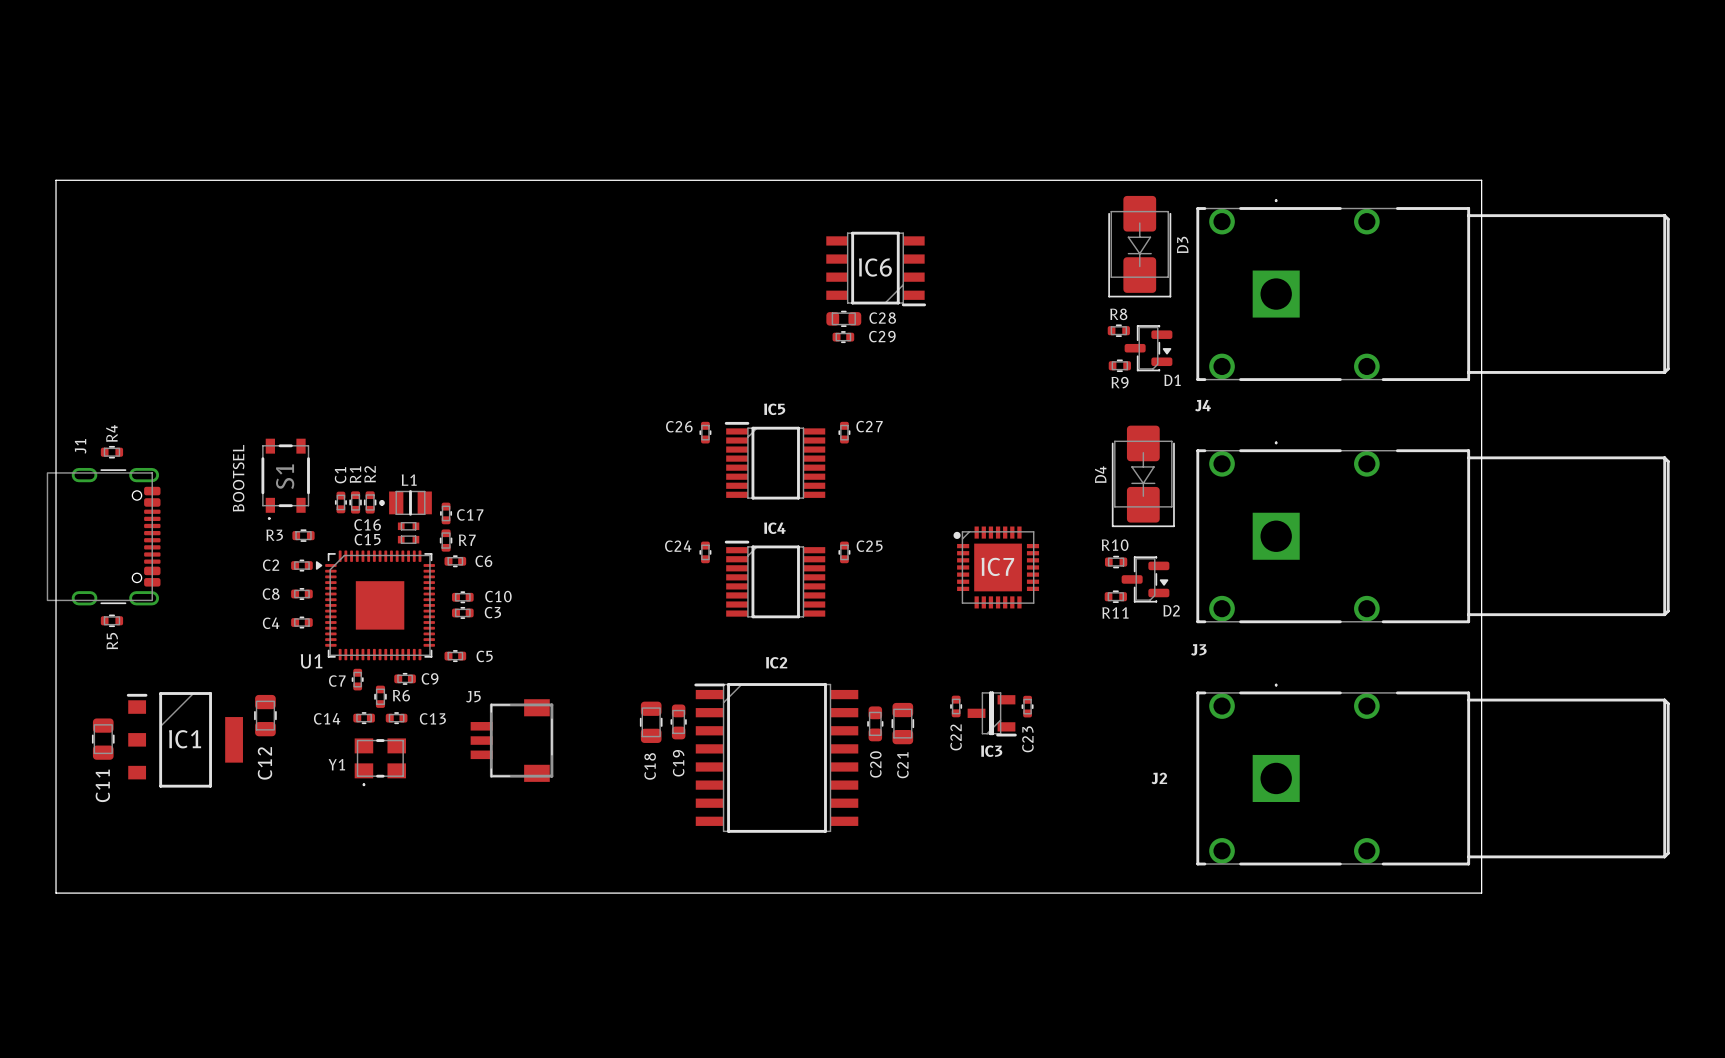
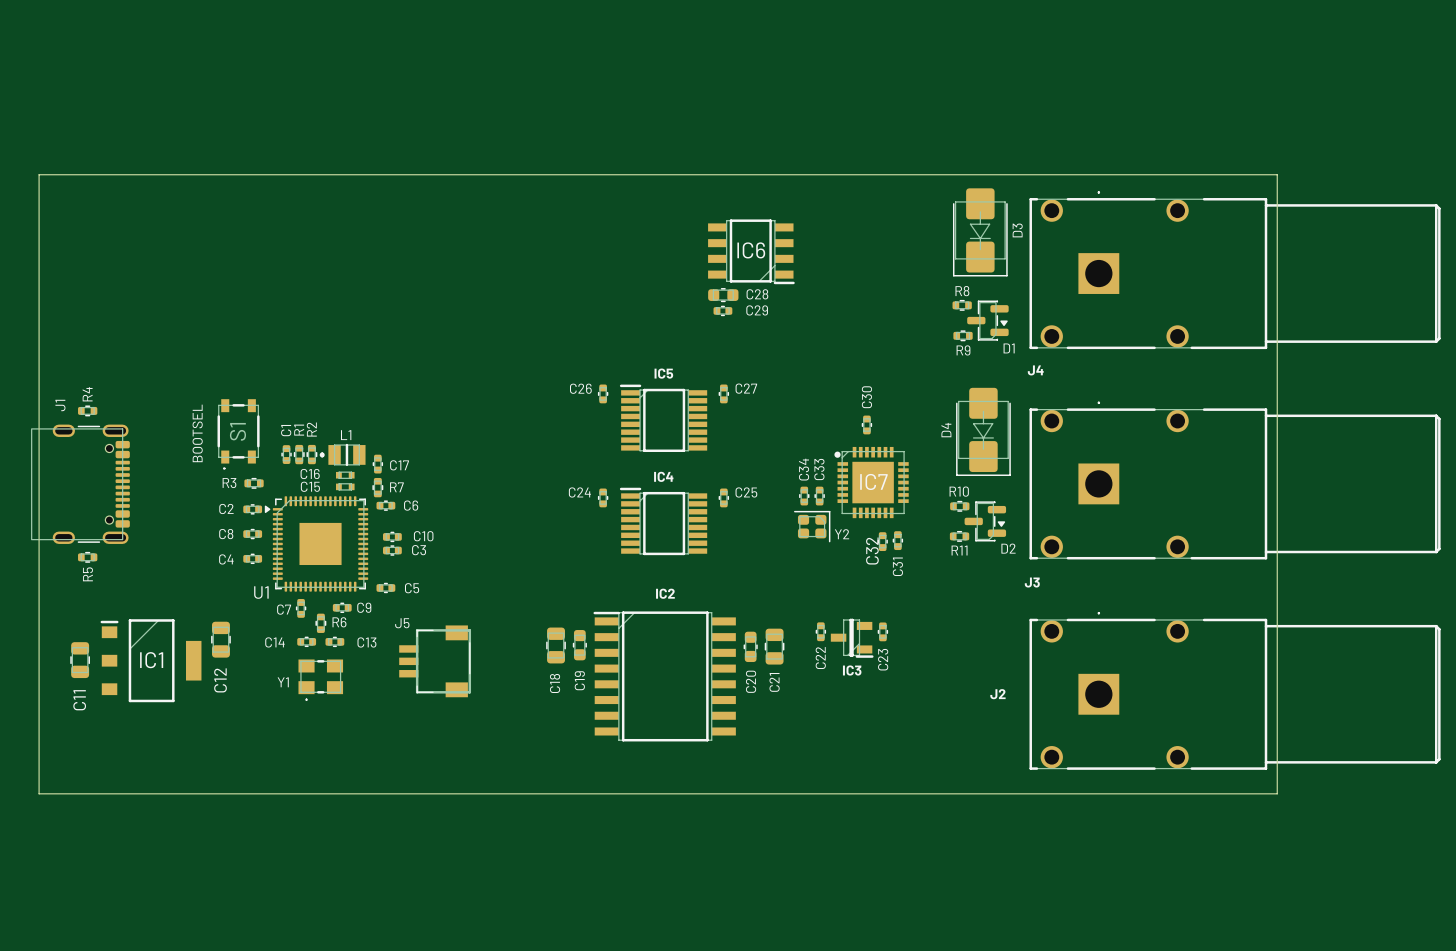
C30: none -> (866, 424)
C34: none -> (804, 496)
C33: none -> (819, 496)
IC7 position: (996, 567) -> (871, 482)
Y2: none -> (812, 526)
C31: none -> (897, 540)
C32: none -> (882, 541)

